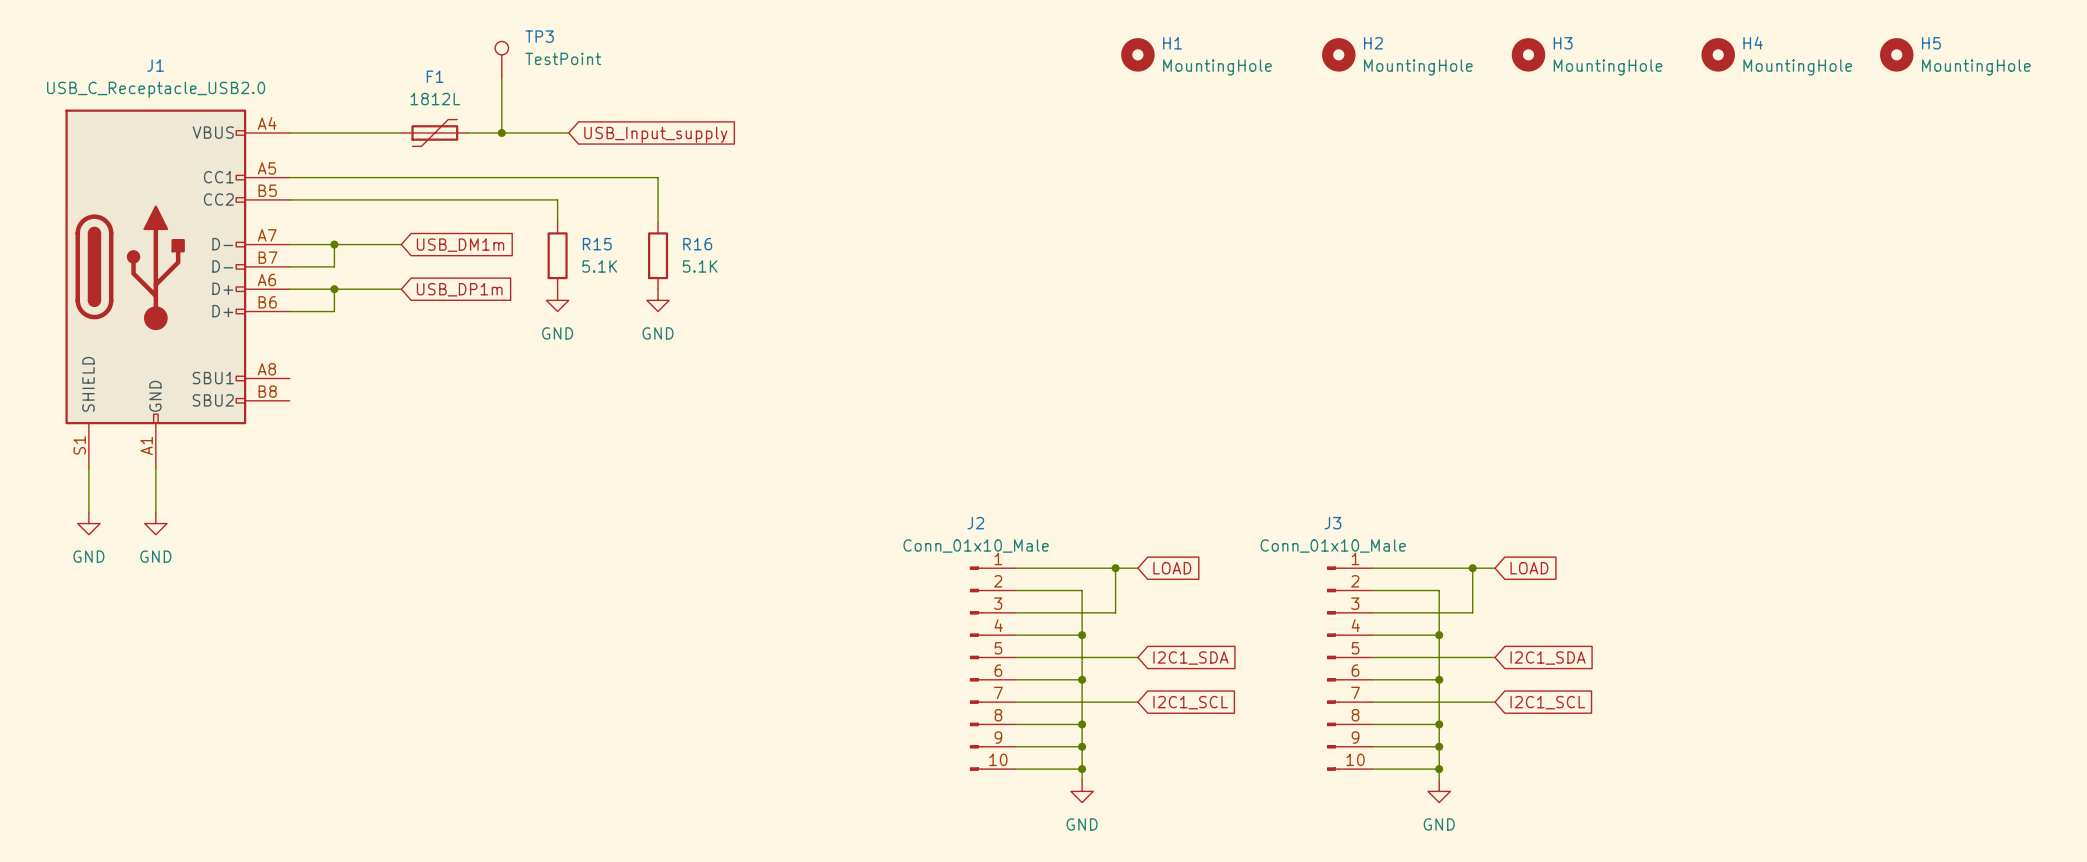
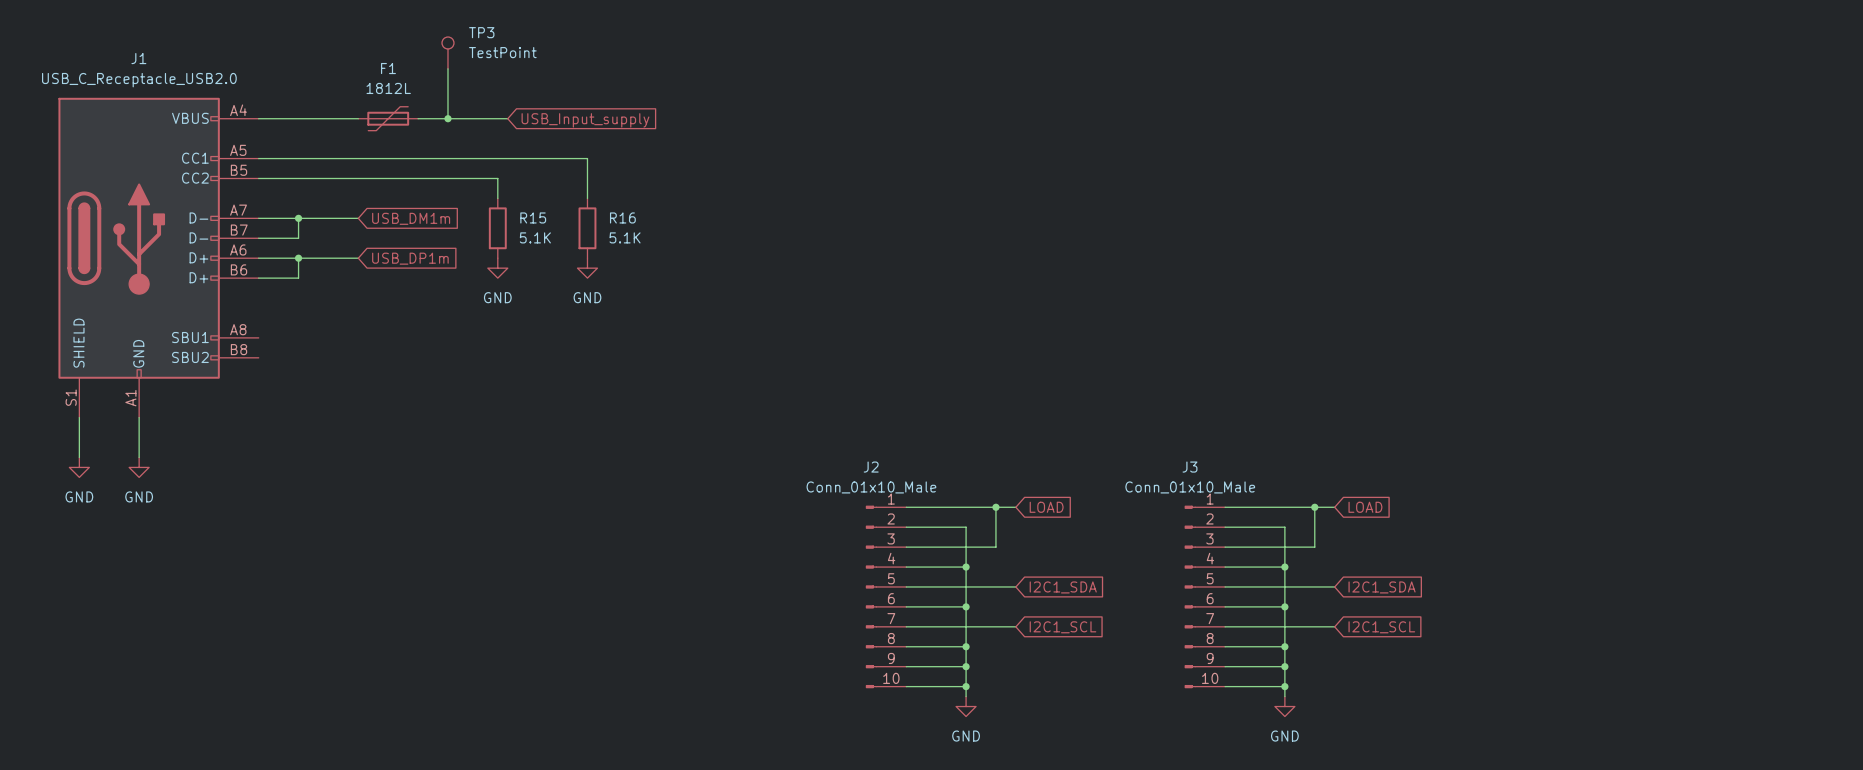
H1: MountingHole (1137, 54) -> none
H2: MountingHole (1338, 54) -> none
H3: MountingHole (1528, 54) -> none
H4: MountingHole (1718, 54) -> none
H5: MountingHole (1896, 54) -> none

